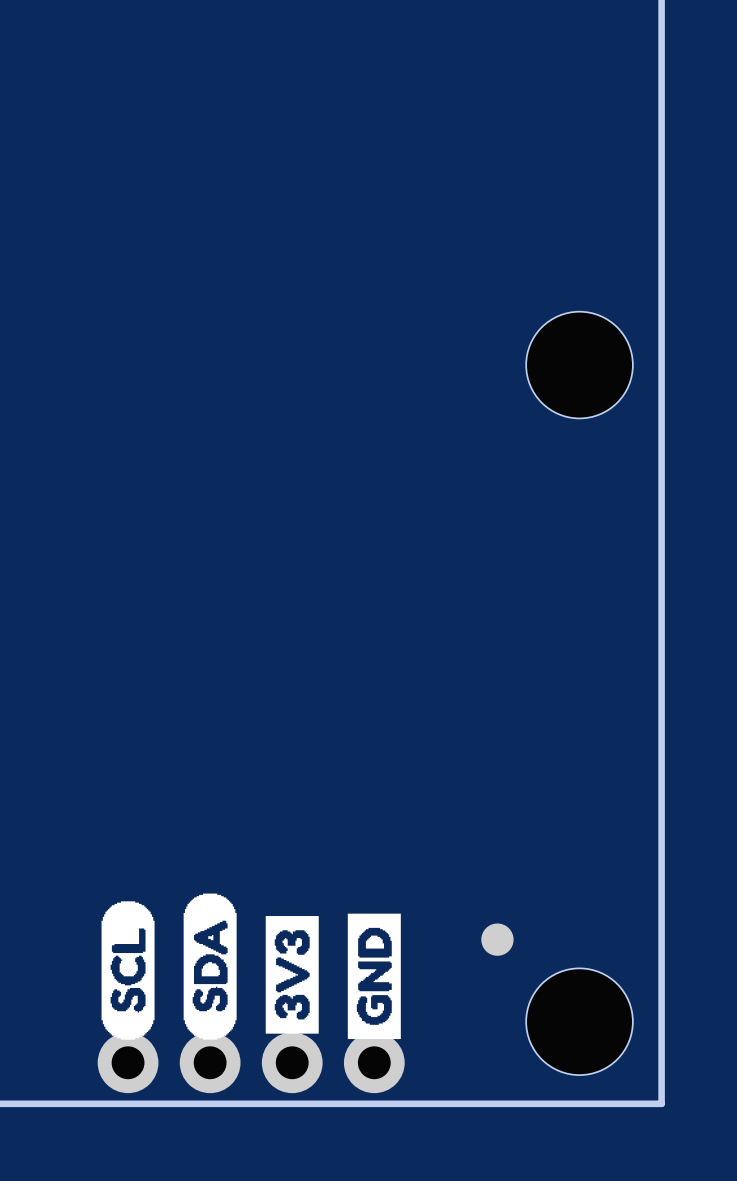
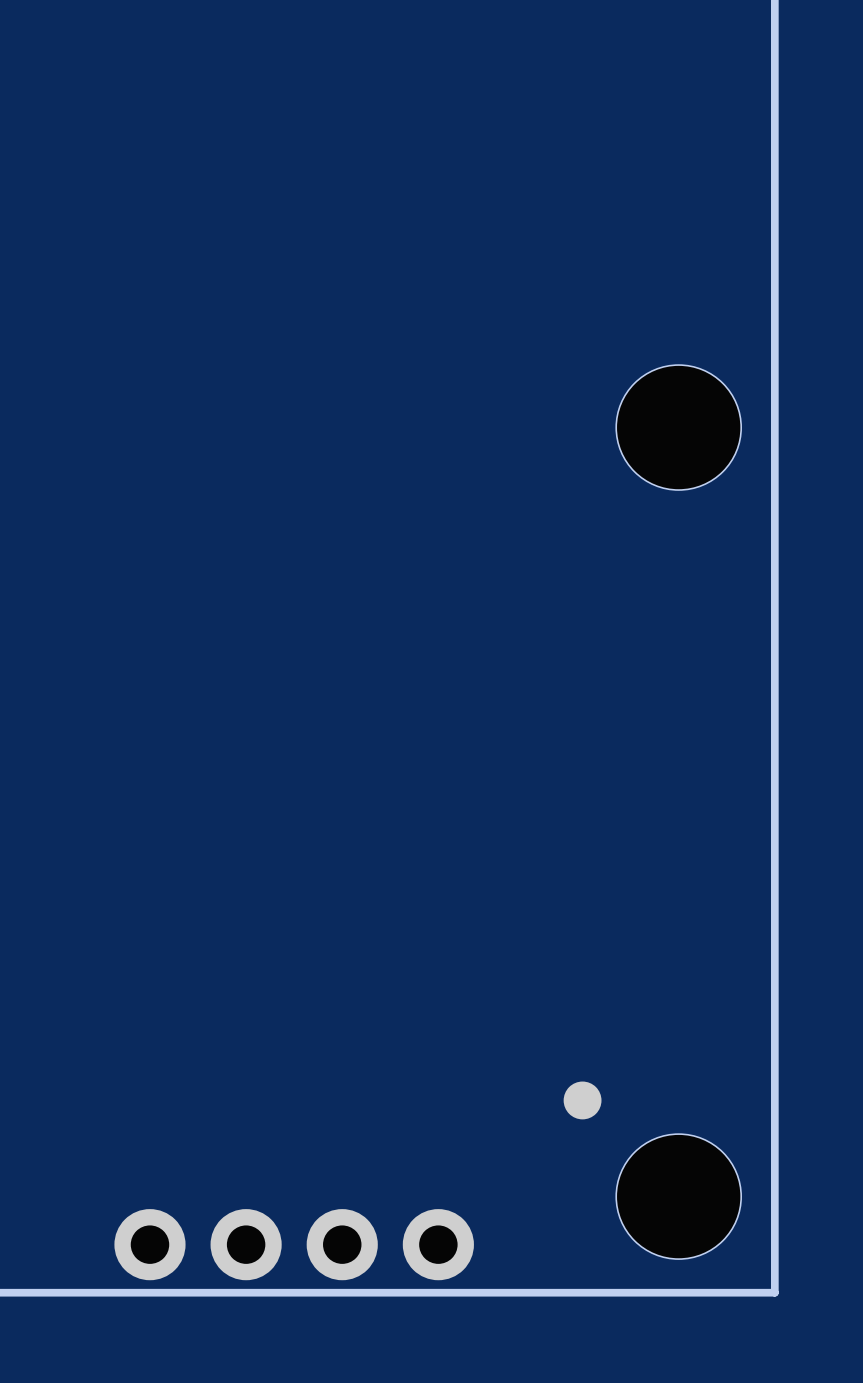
drawing: [101, 893, 401, 1040] -> none

